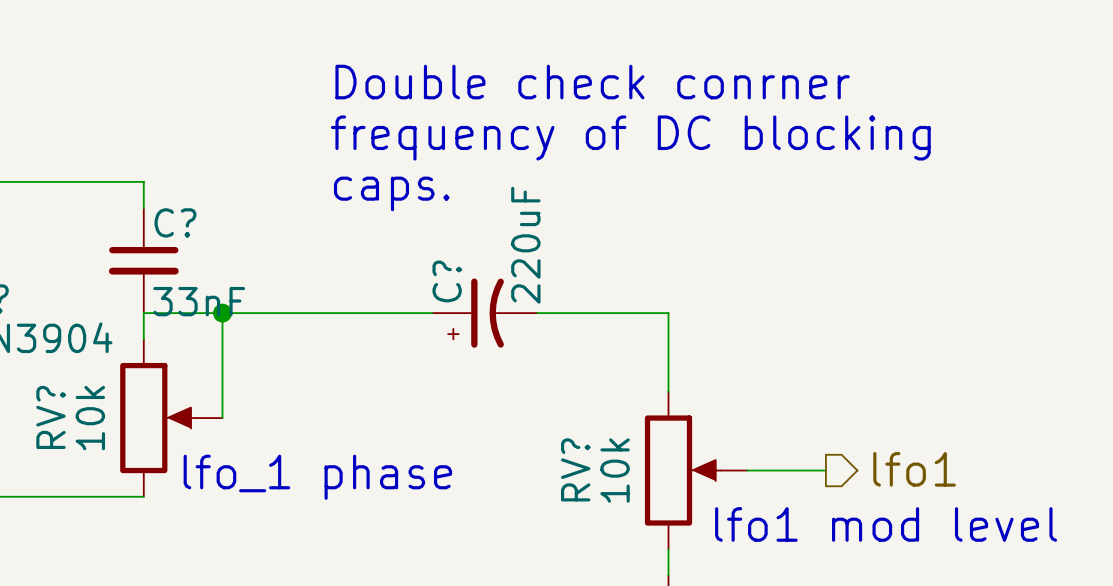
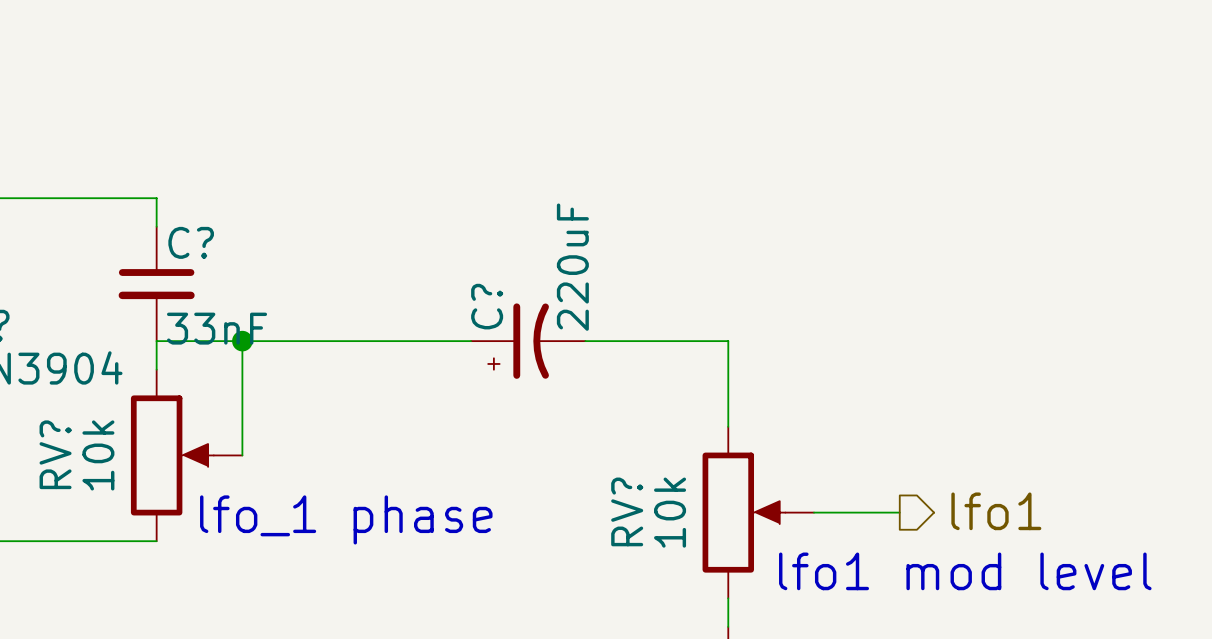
text: Double check conrner (592, 82) -> none
text: frequency of DC blocking (630, 137) -> none
text: caps. (391, 193) -> none

